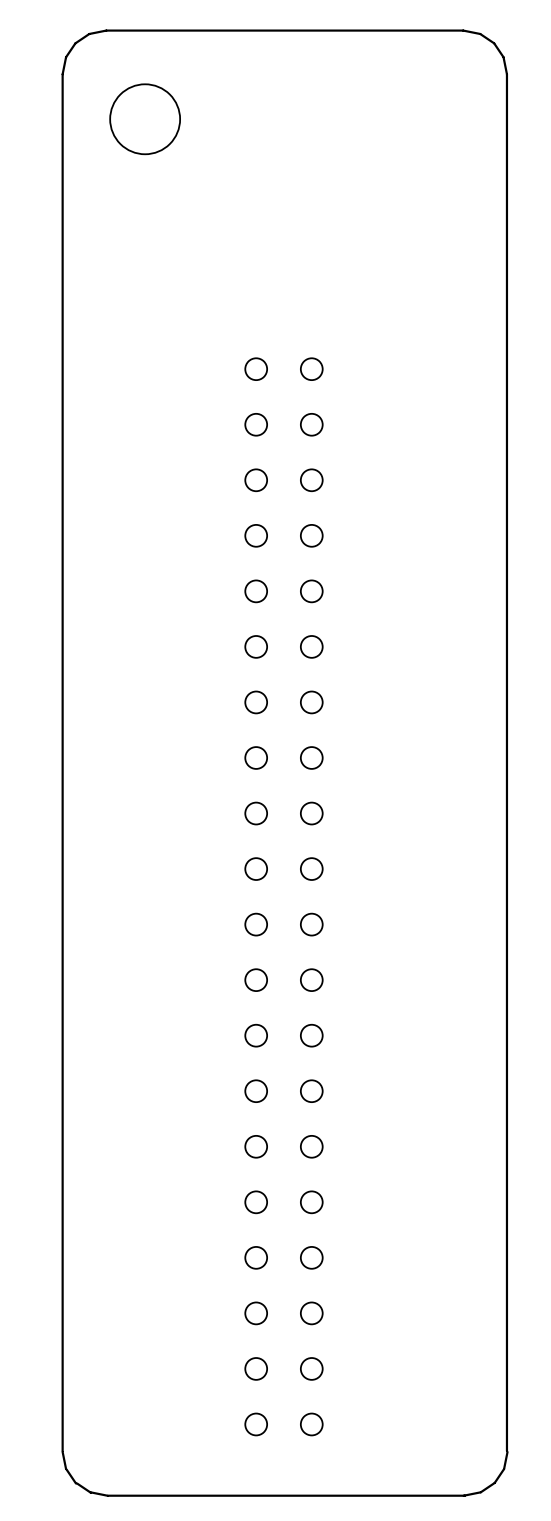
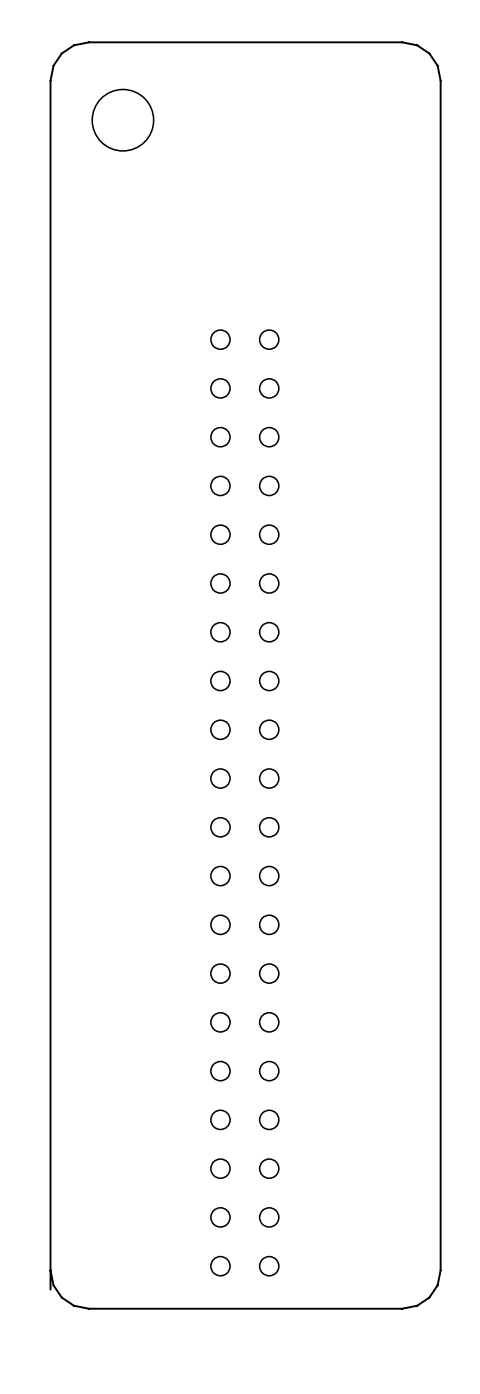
board edge: (506, 1429) (506, 1451) -> (440, 1270) (437, 1285) (429, 1297) (417, 1305) (402, 1308) (88, 1308) (73, 1305) (61, 1297) (53, 1285) (50, 1270)
board edge: (62, 1451) (66, 1469) -> none
board edge: (507, 1451) (504, 1469) (494, 1482) (480, 1492) (463, 1495) -> none
board edge: (66, 1469) (75, 1483) -> none
board edge: (77, 1483) (90, 1492) -> none
board edge: (90, 1492) (107, 1495) -> none
board edge: (464, 1495) (108, 1495) -> none

